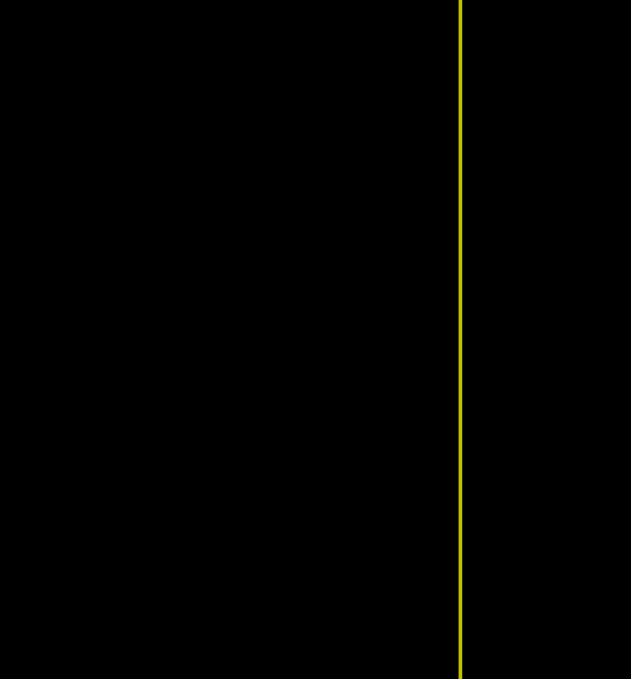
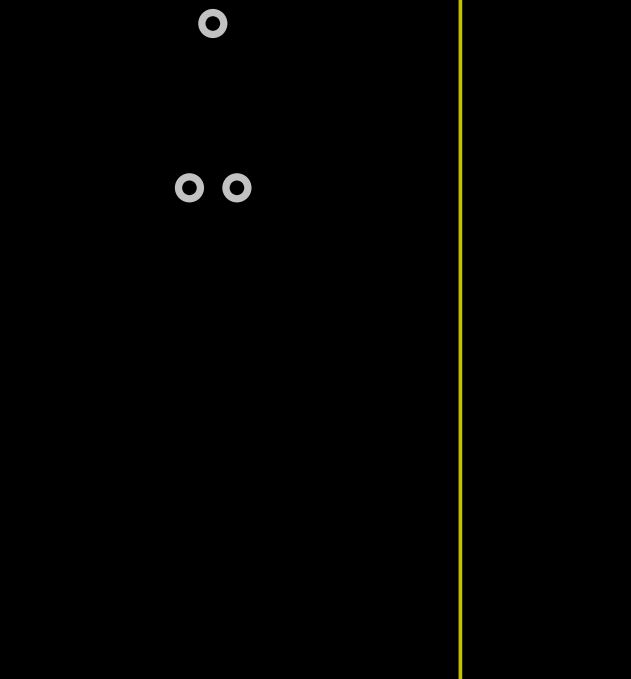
via: none -> (212, 23)
via: none -> (189, 187)
via: none -> (236, 187)

